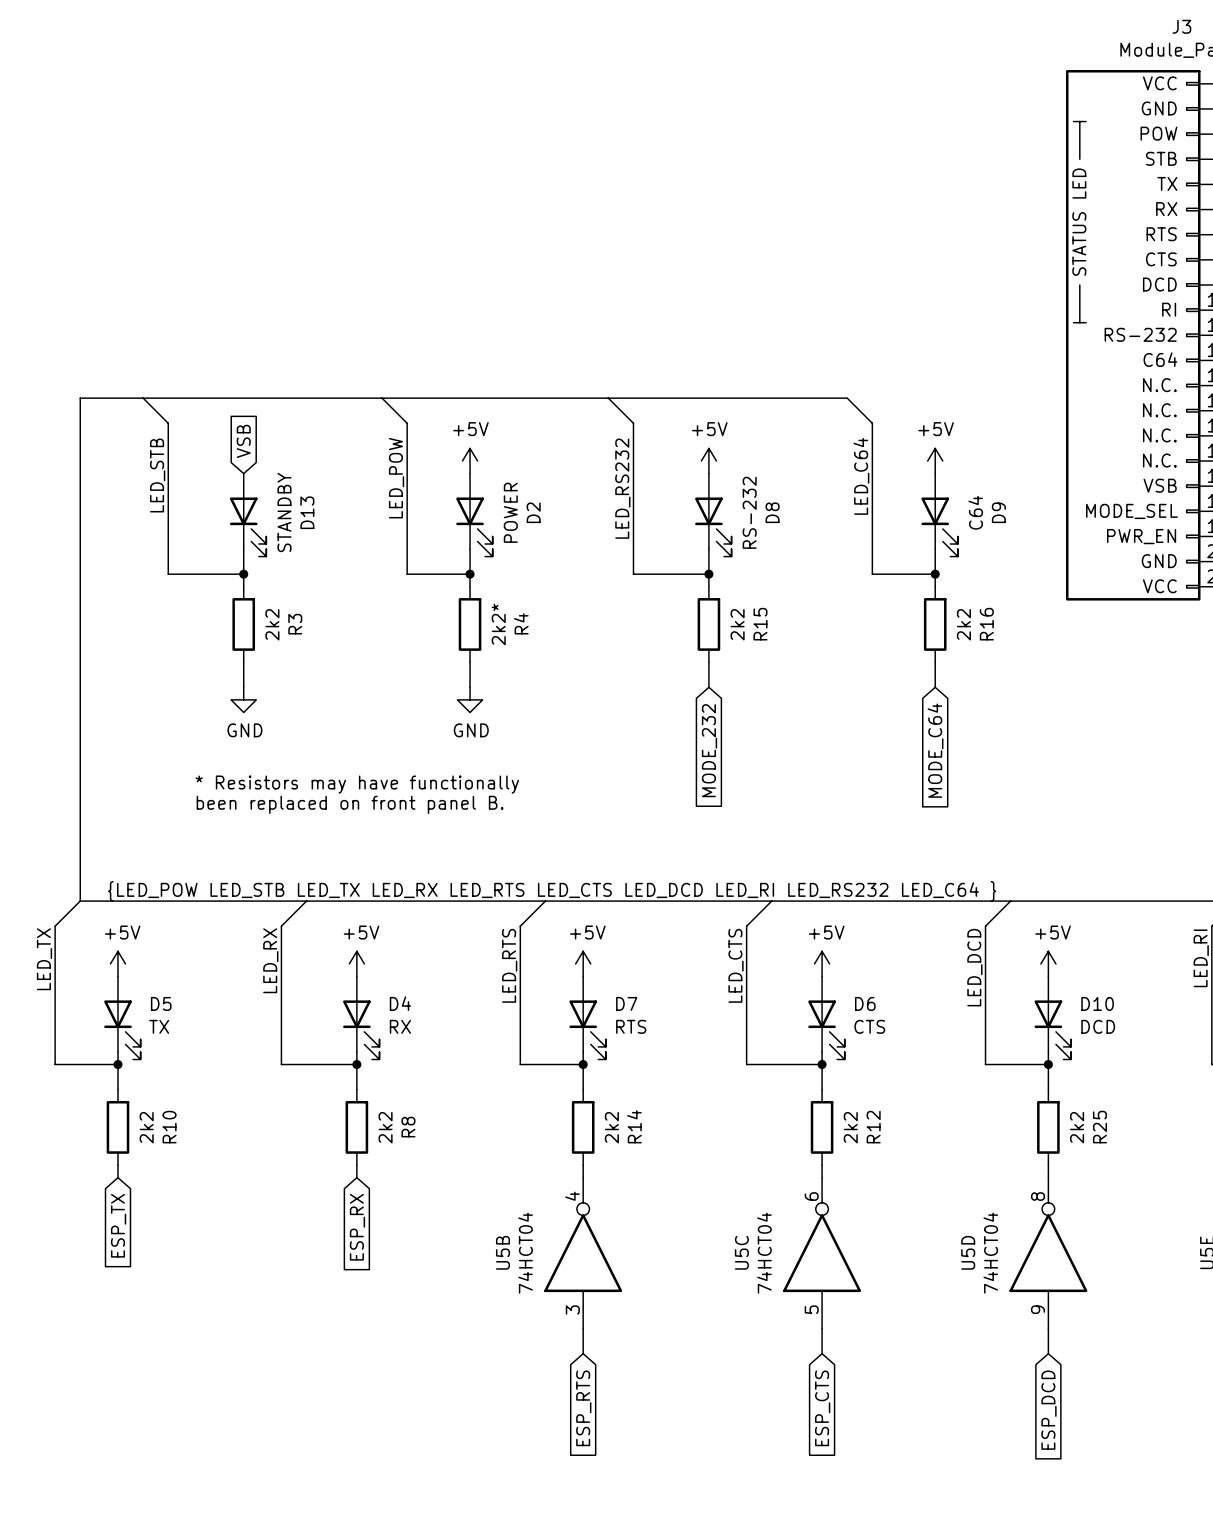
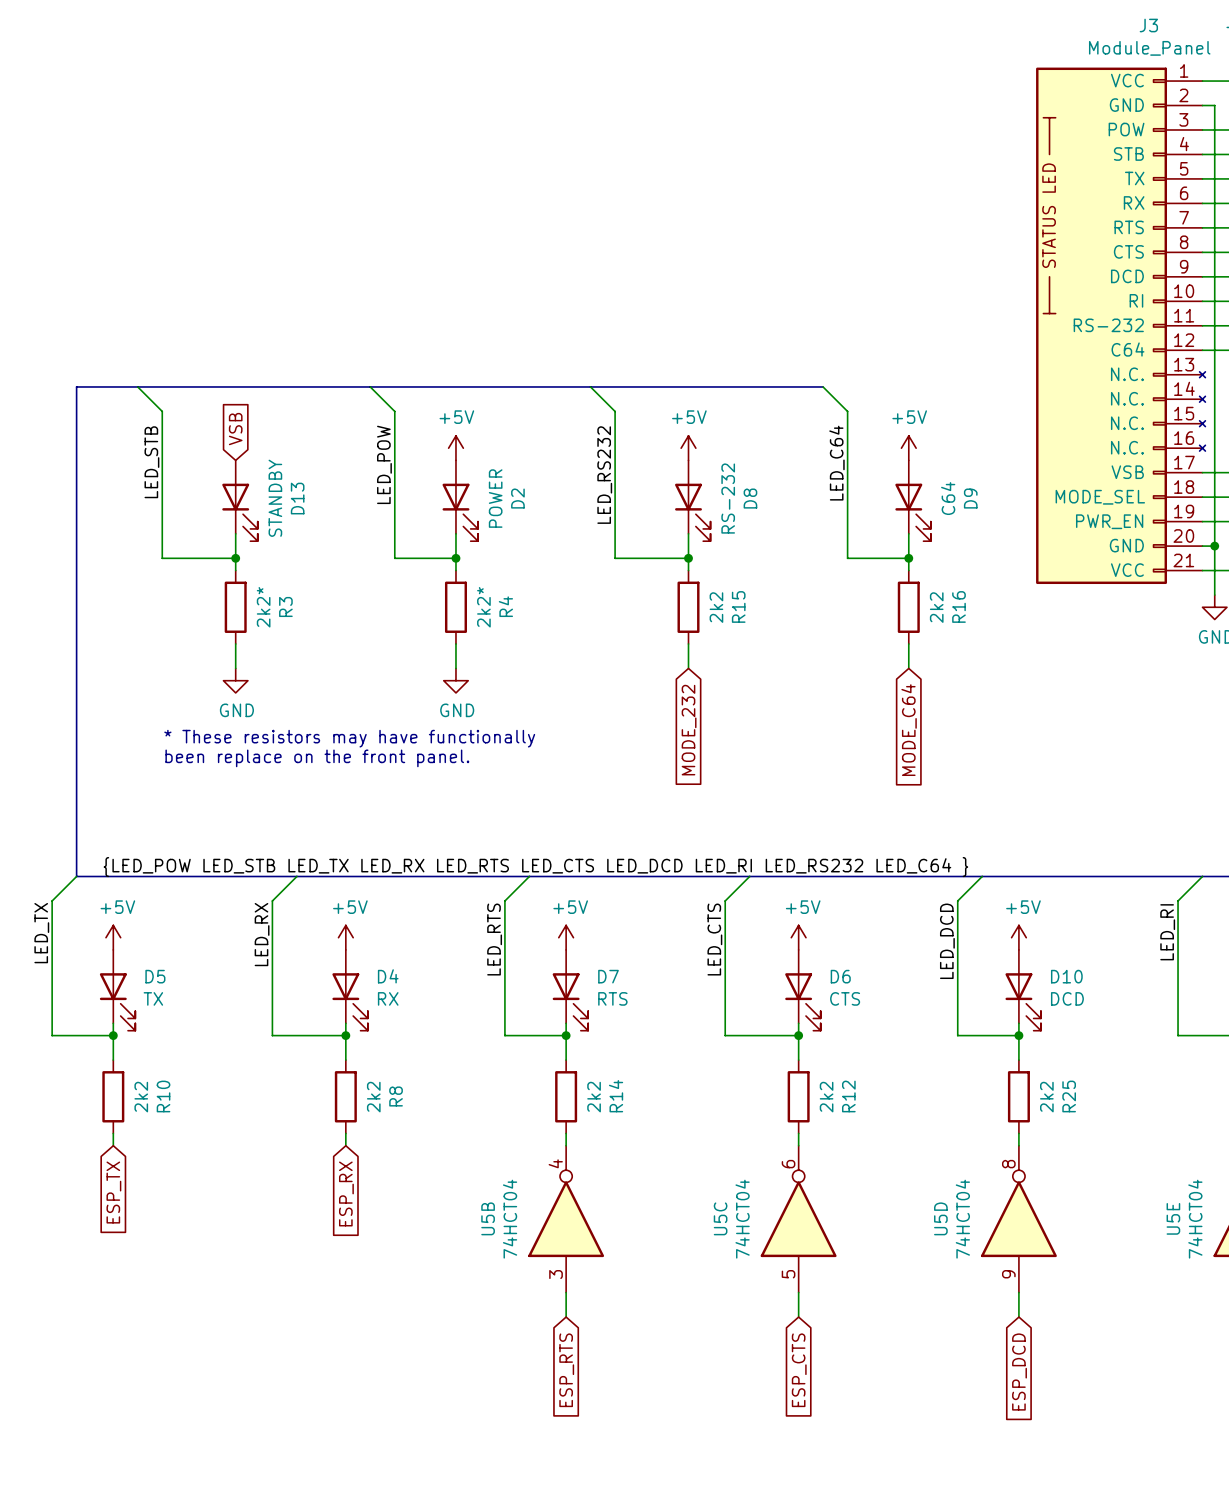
R3 value: 2k2 (272, 624) -> 2k2* (263, 607)
text: * Resistors may have functionally (357, 784) -> * These resistors may have functionally (349, 738)
text: been replaced on front panel B. (350, 804) -> been replace on the front panel. (317, 758)

